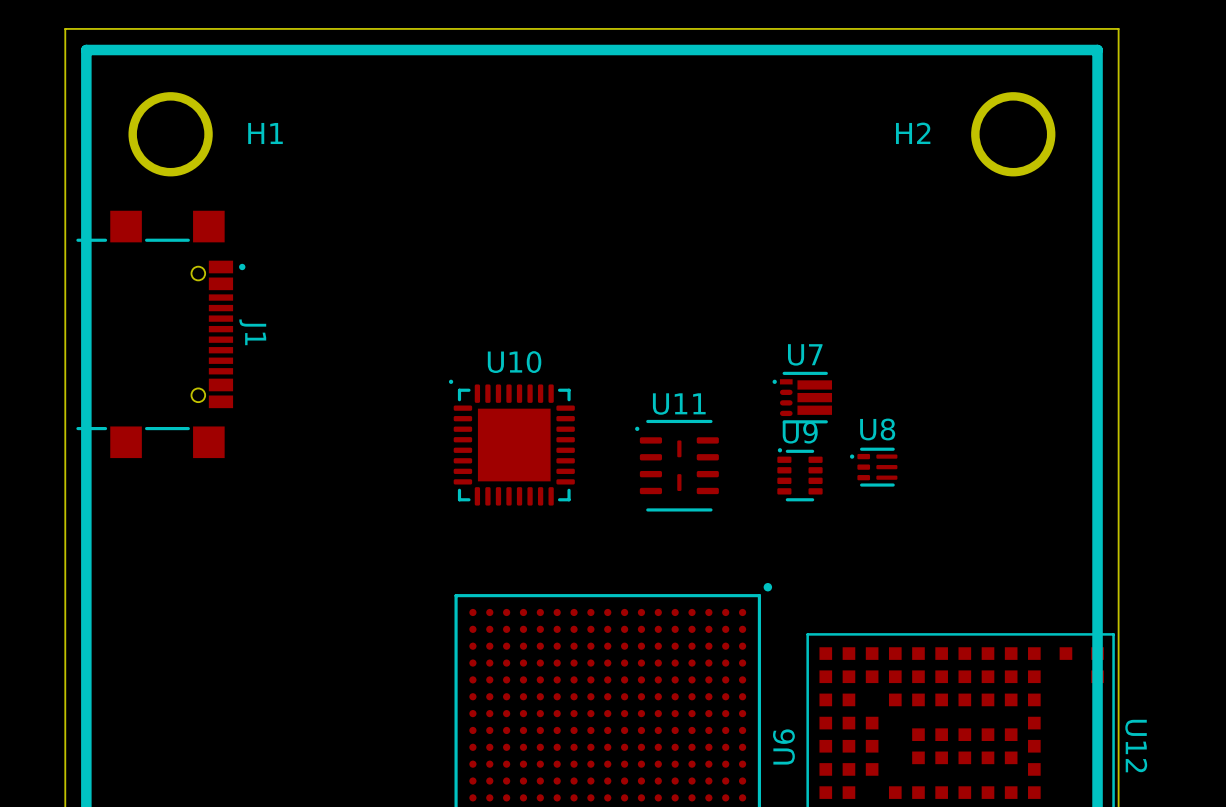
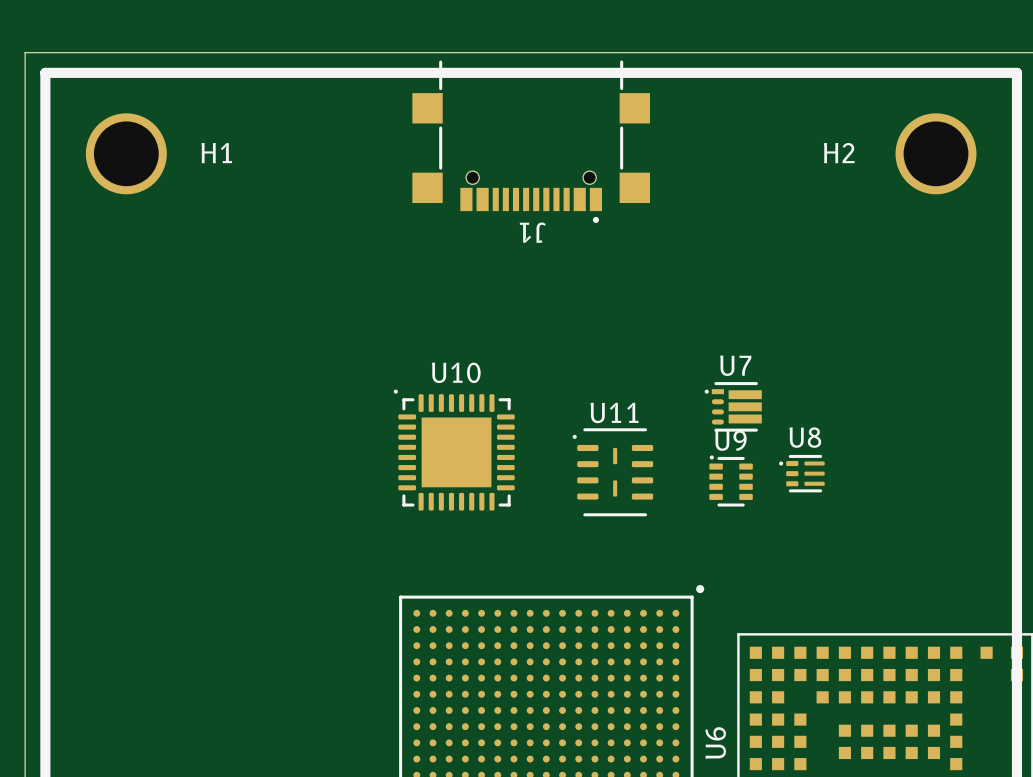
J1 rotation: 0° (160, 334) -> 90° clockwise (531, 141)
J1 position: (160, 334) -> (531, 141)

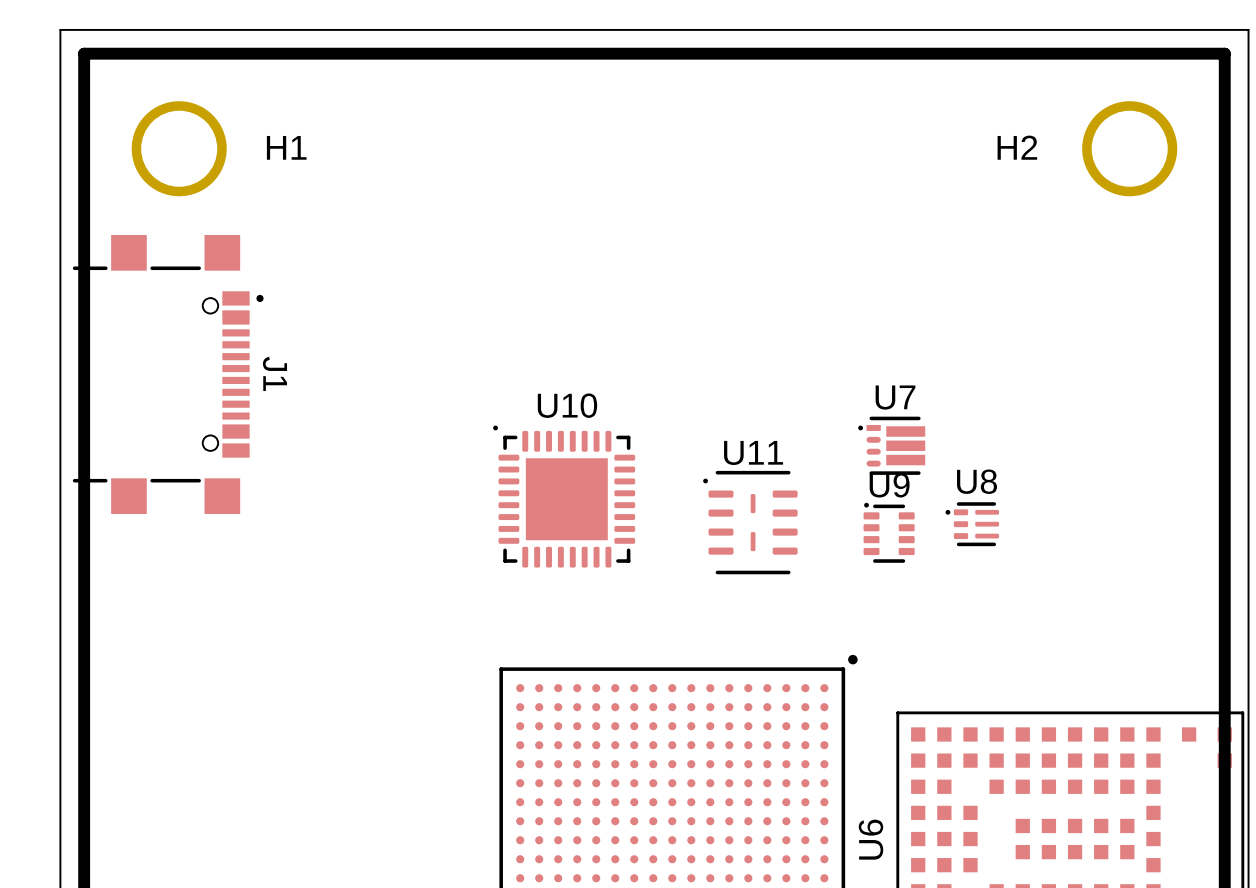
J1 rotation: 0° (531, 141) -> 90° counterclockwise (168, 374)
J1 position: (531, 141) -> (168, 374)

